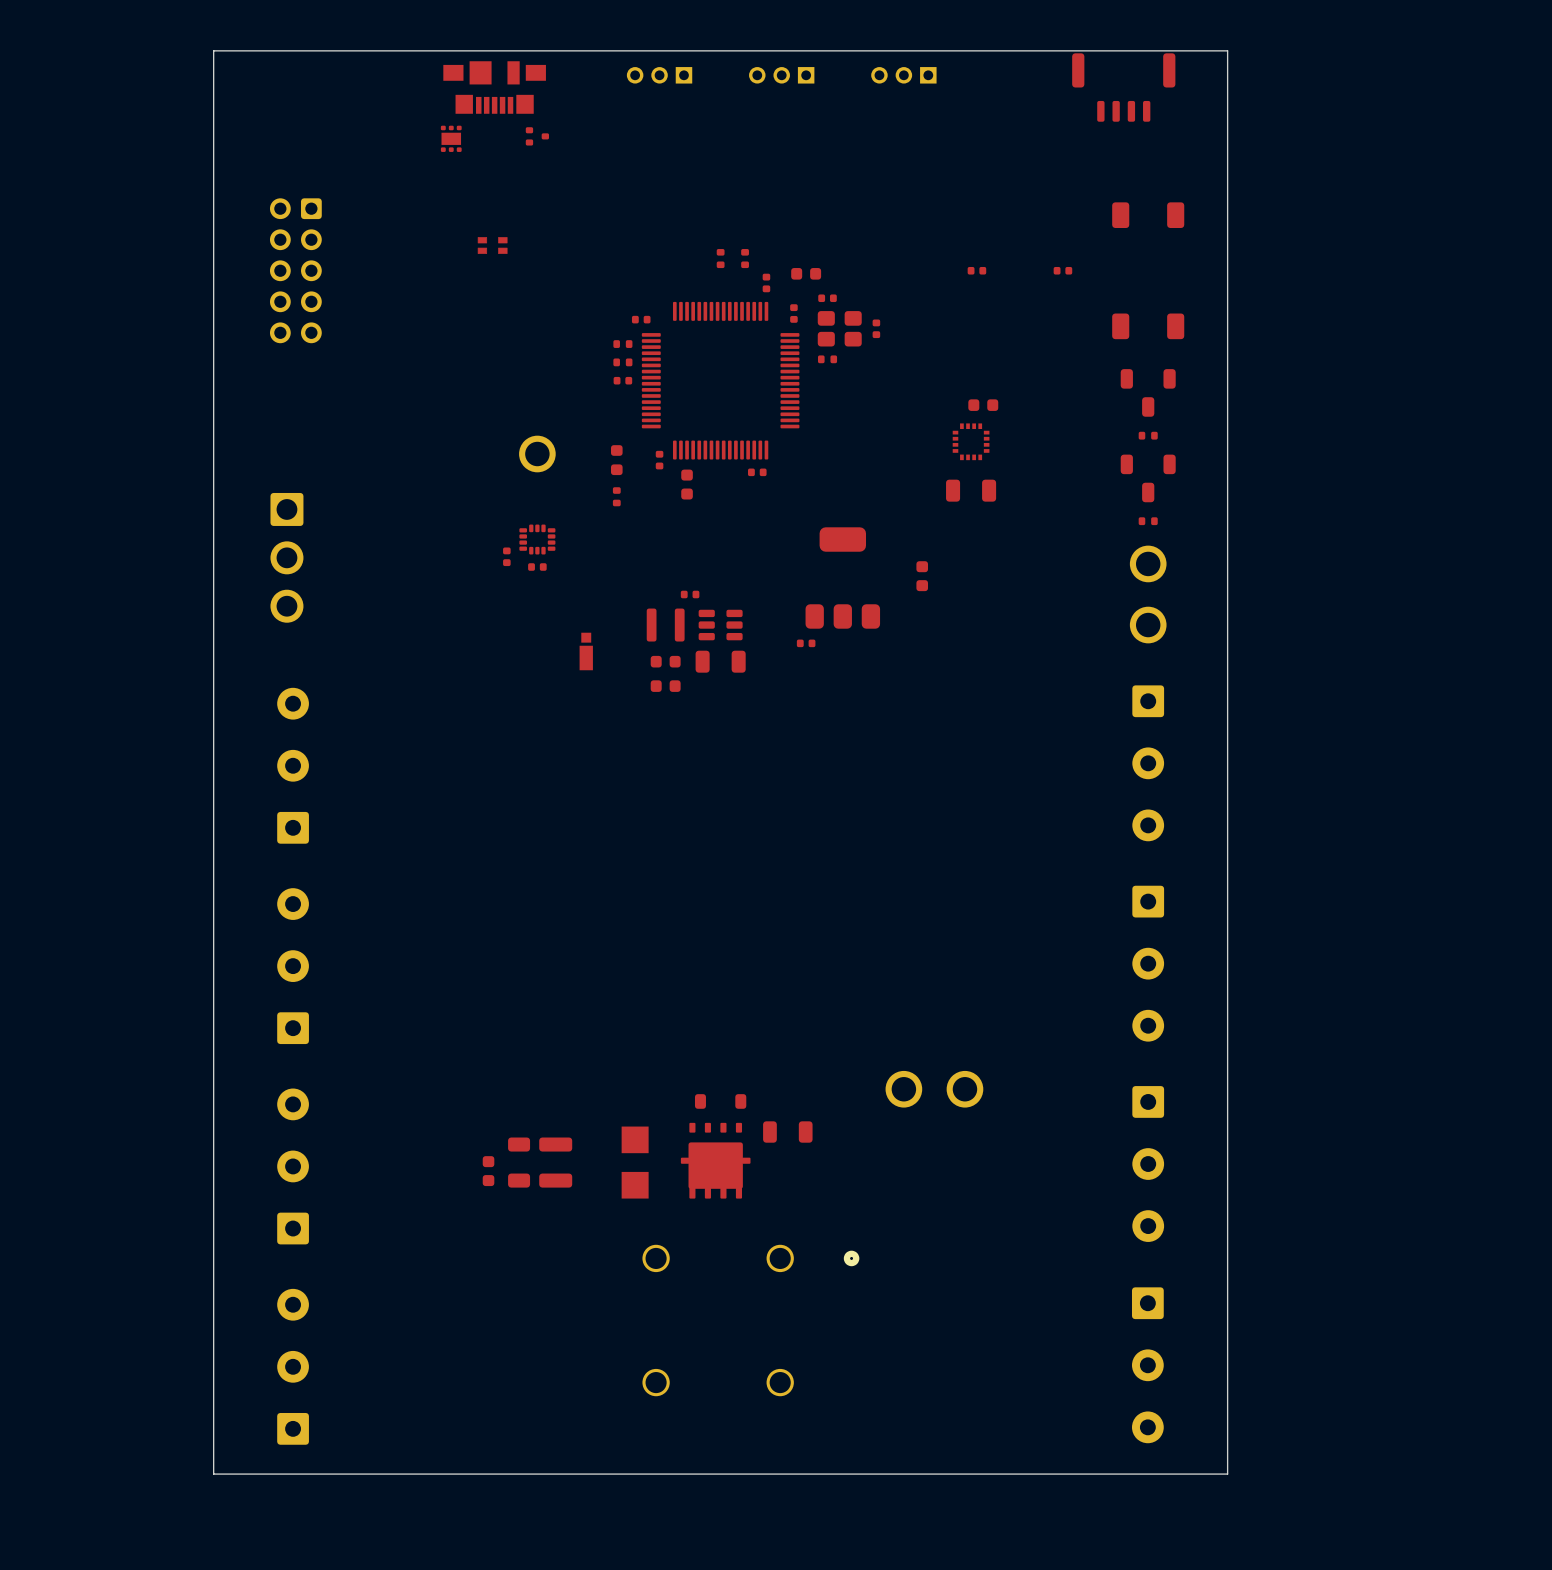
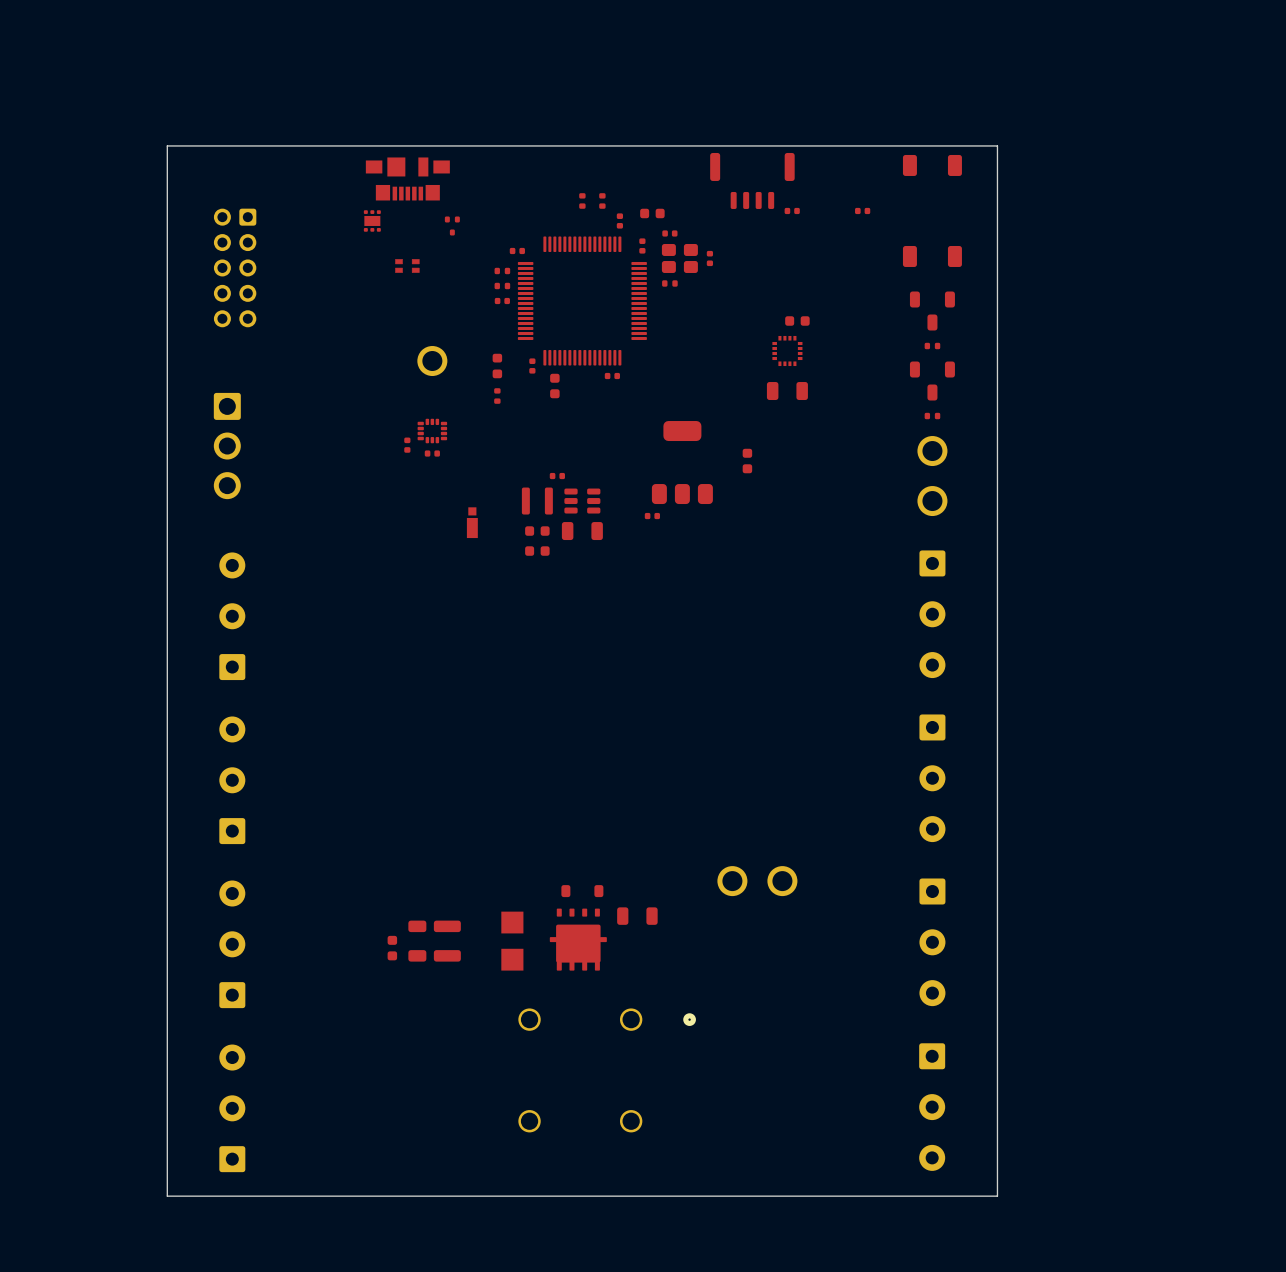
part: (659, 75) -> none
part: (781, 75) -> none
part: (903, 75) -> none
part position: (494, 87) -> (407, 178)
part position: (1123, 87) -> (752, 180)
part rotation: 0° (537, 136) -> 90° clockwise (452, 225)
part position: (537, 136) -> (452, 225)
part position: (451, 138) -> (372, 220)
board edge: (1227, 191) (1227, 50) (213, 50) (213, 191) -> (997, 145) (167, 145)
part position: (492, 245) -> (407, 265)
part position: (295, 270) -> (235, 267)

